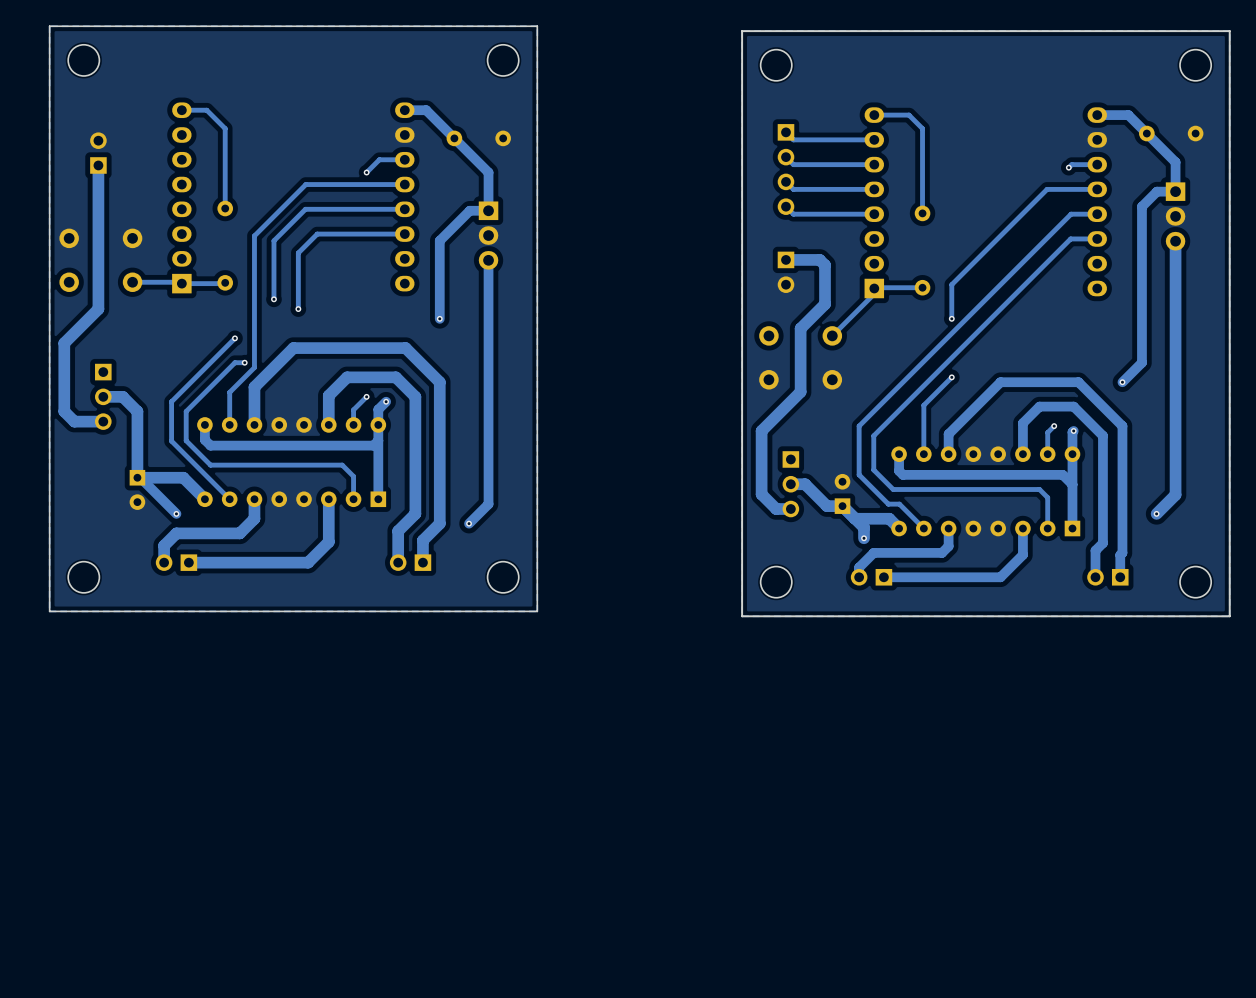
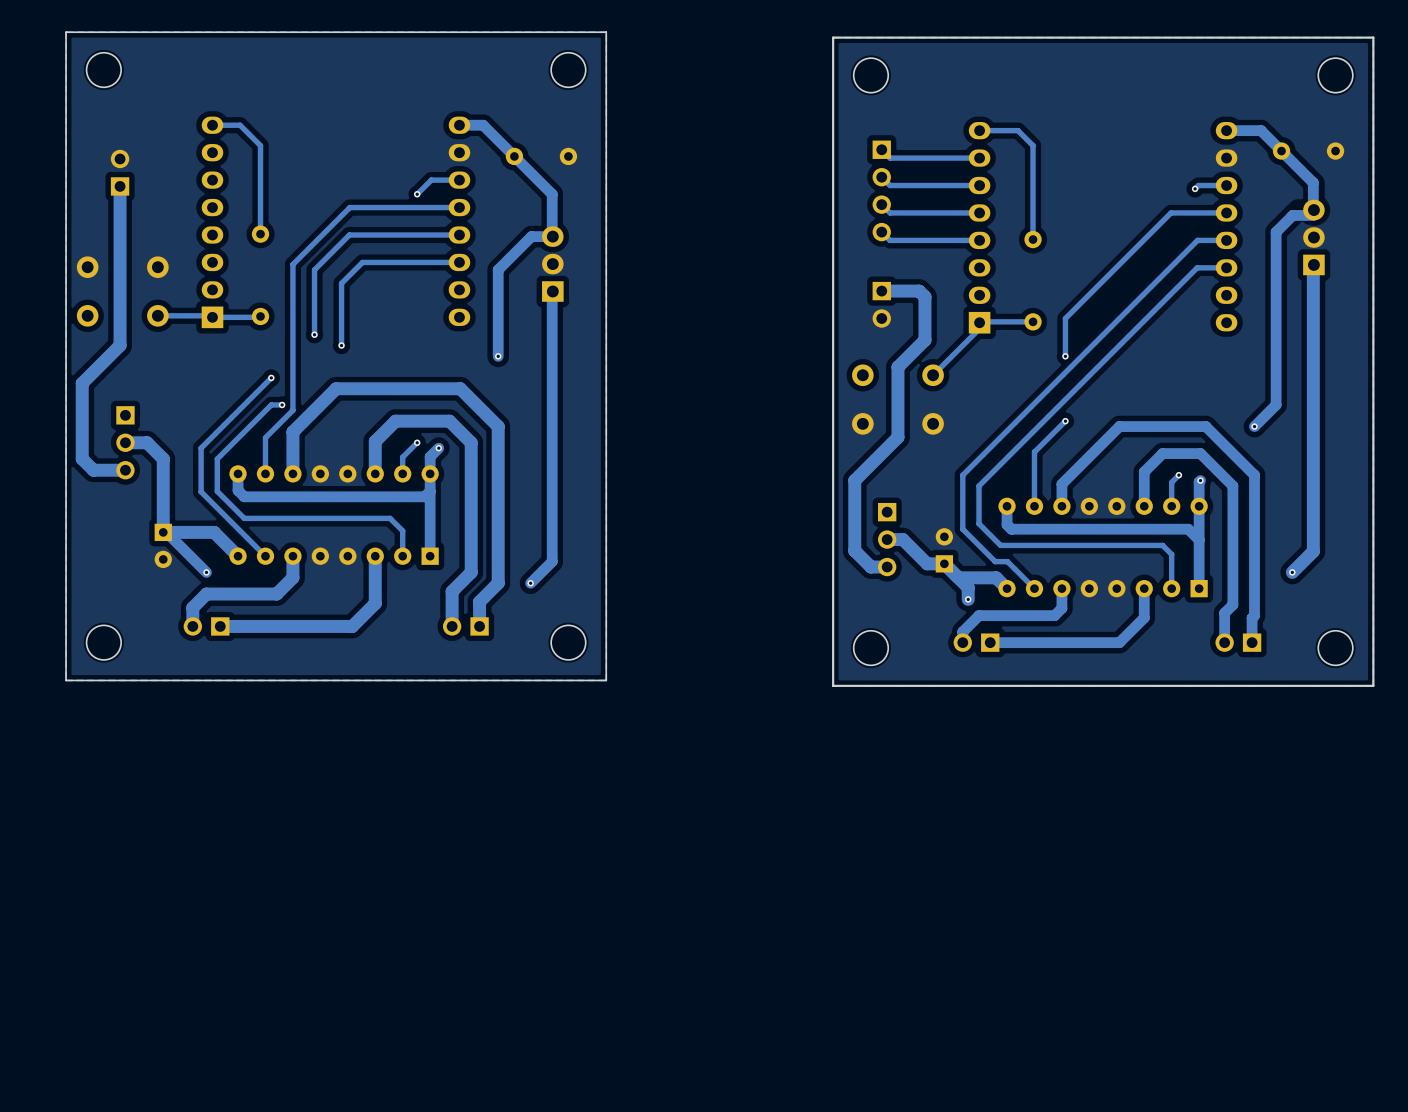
part rotation: 0° (1175, 216) -> 180° (1313, 237)
part rotation: 0° (488, 235) -> 180° (552, 264)

